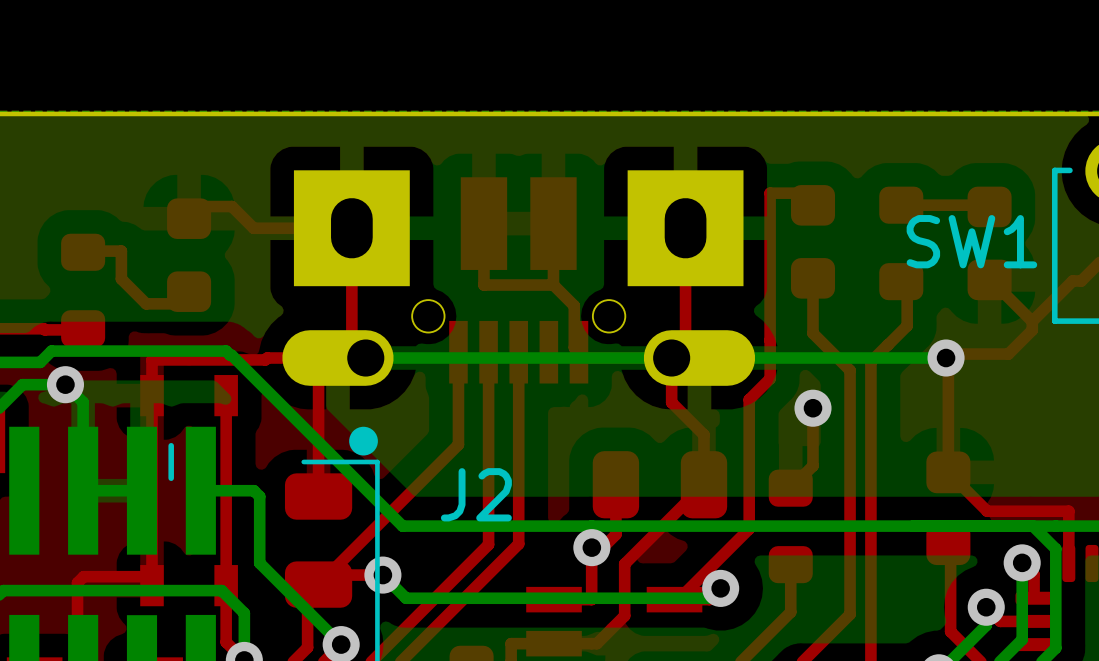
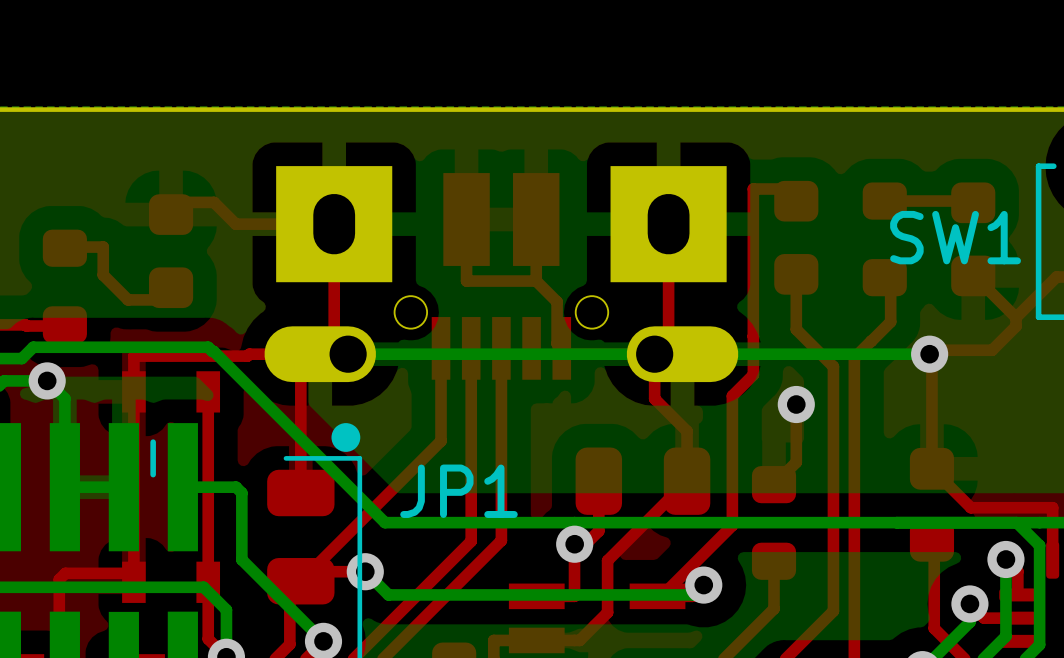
J2 name: J2 (476, 494) -> JP1 (458, 491)

